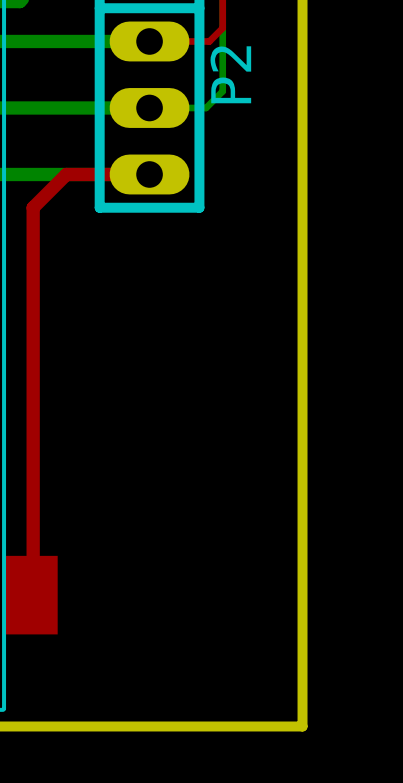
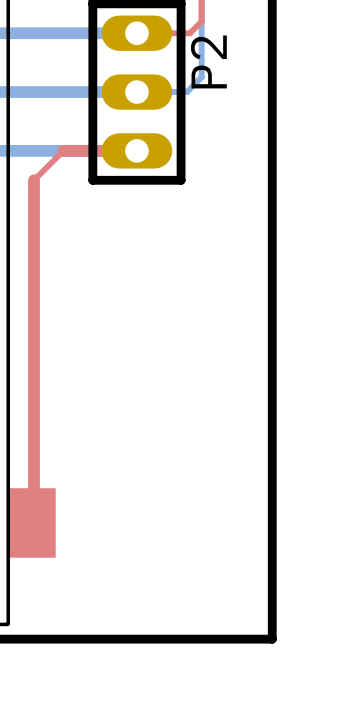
top track width: thick (66, 174) (33, 207) -> thin (63, 150) (34, 180)

